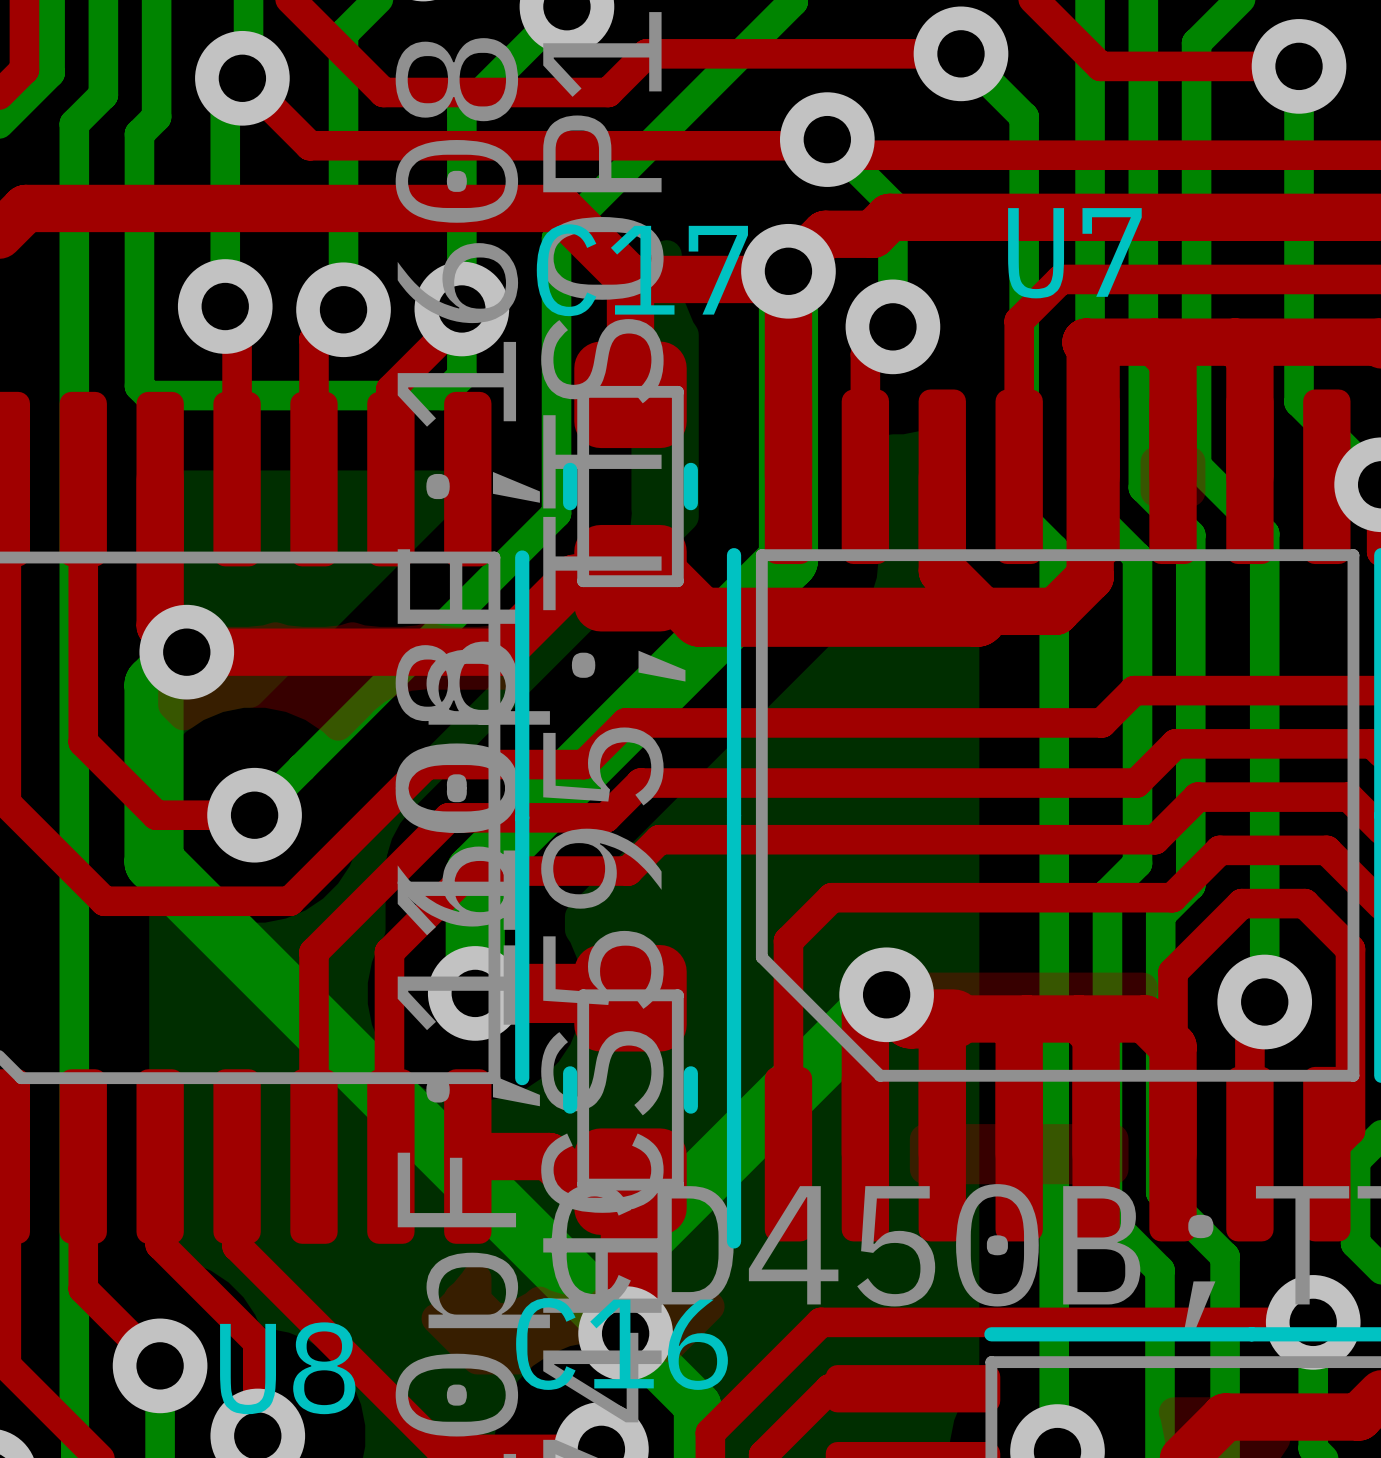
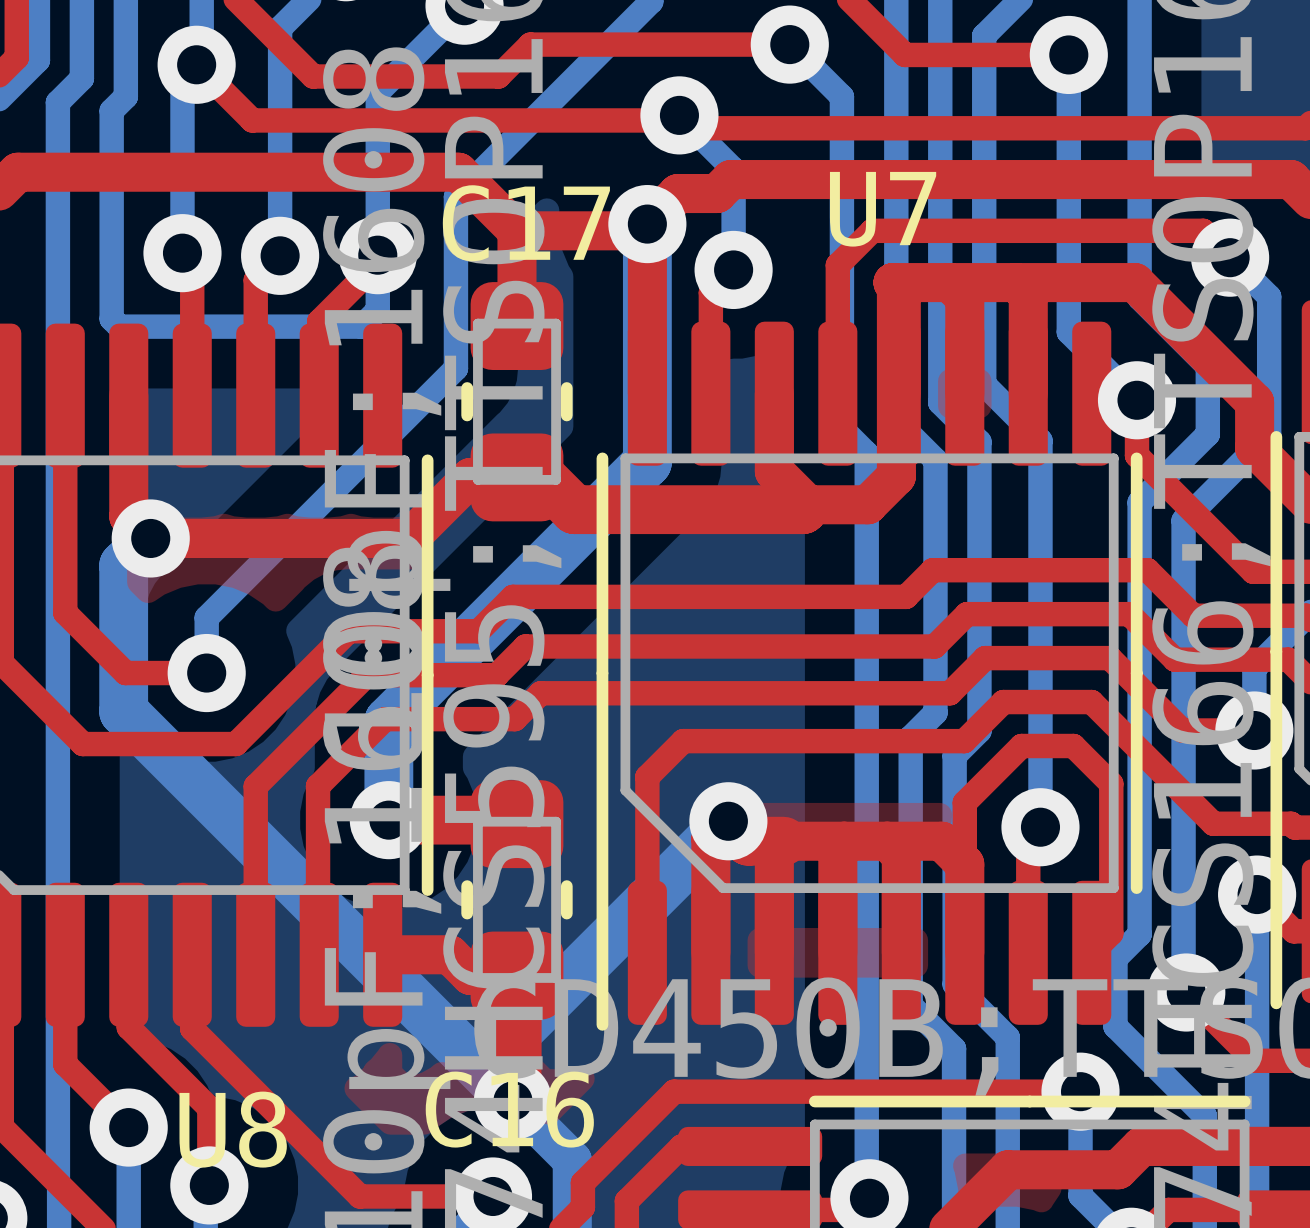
bottom track: (556, 446) (556, 513) (254, 815) -> (455, 368) (206, 617) (206, 673)

